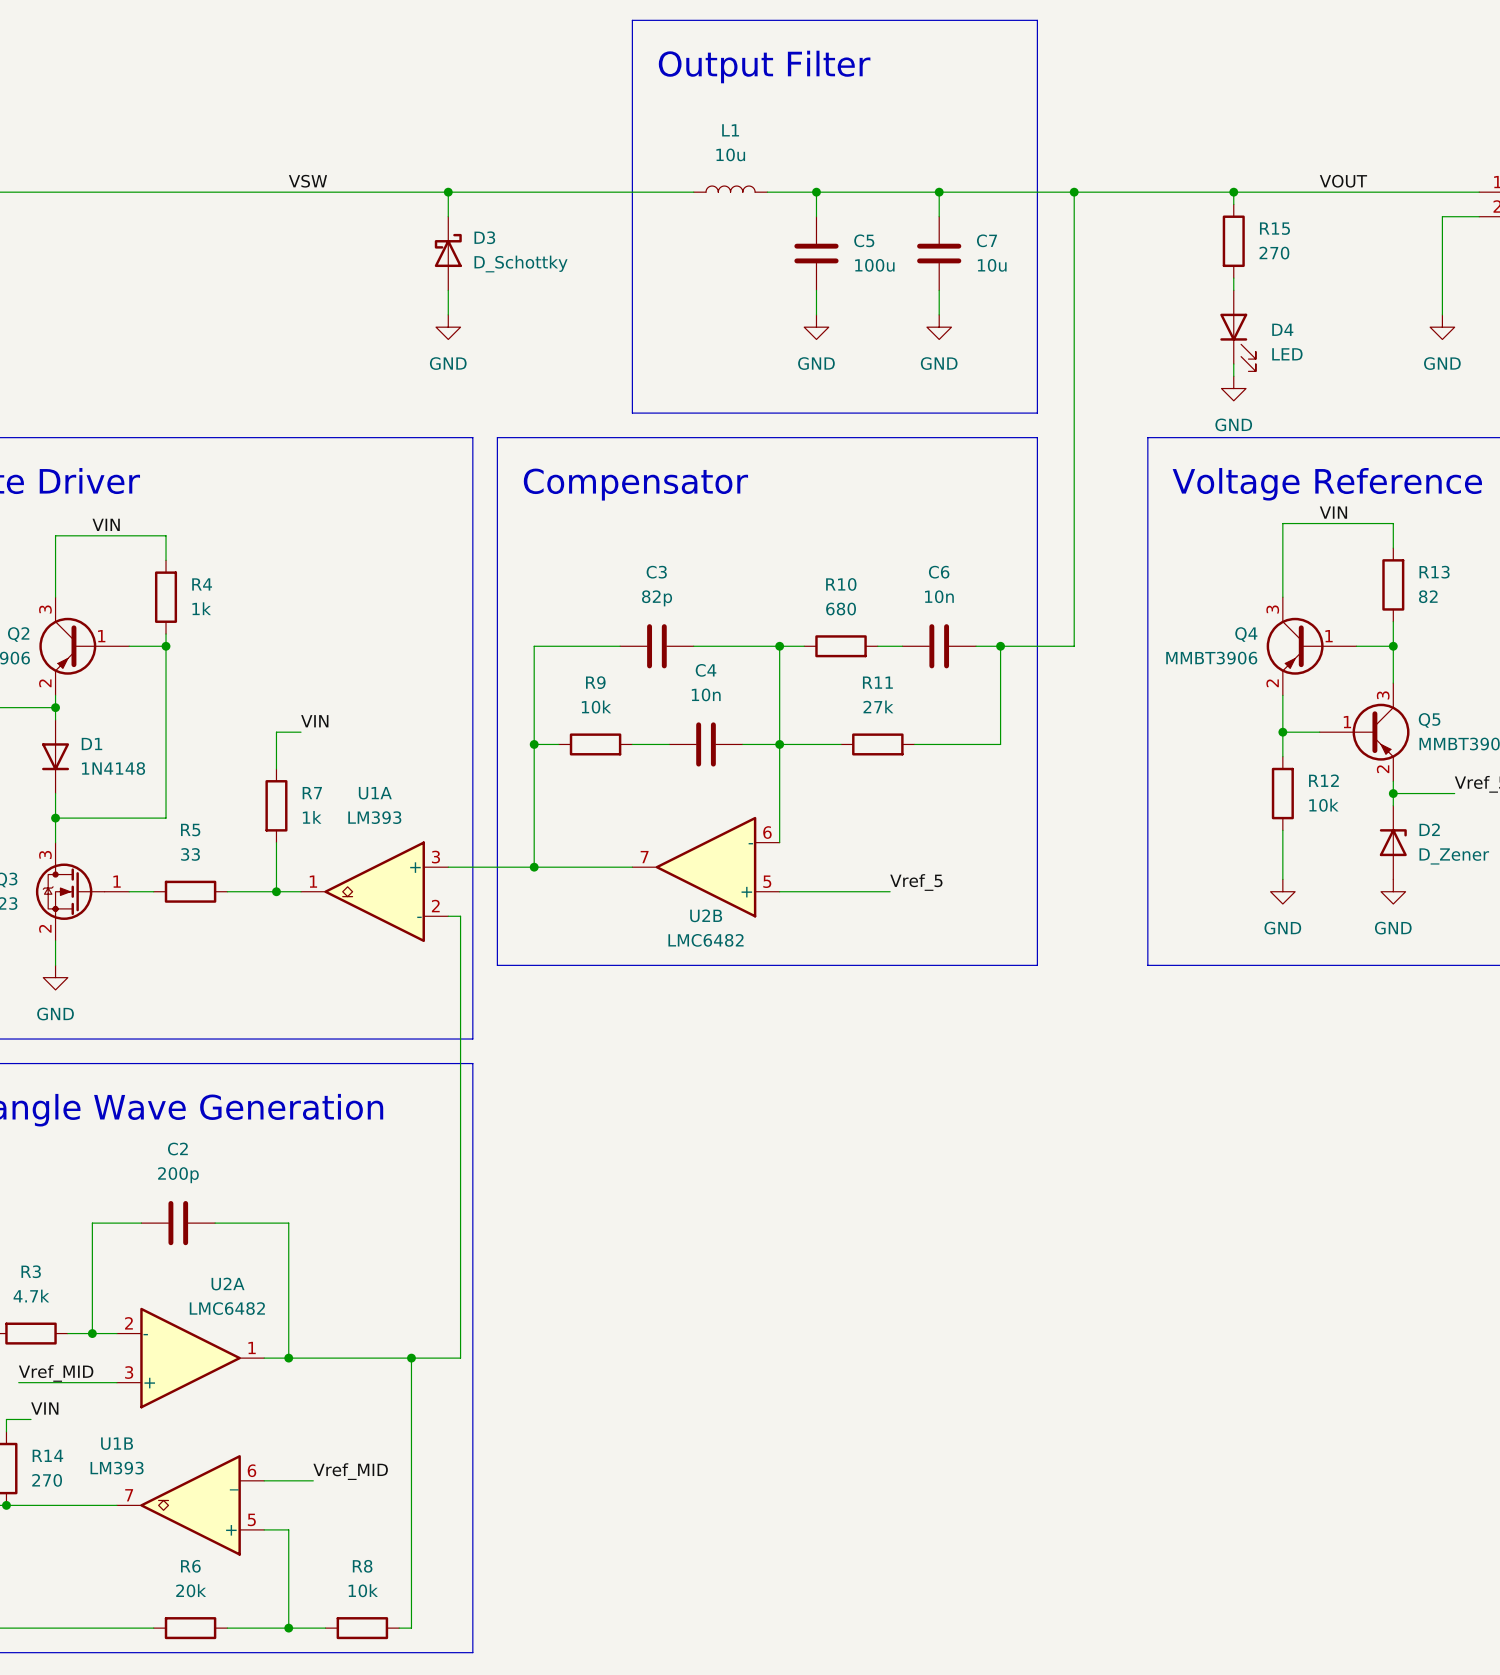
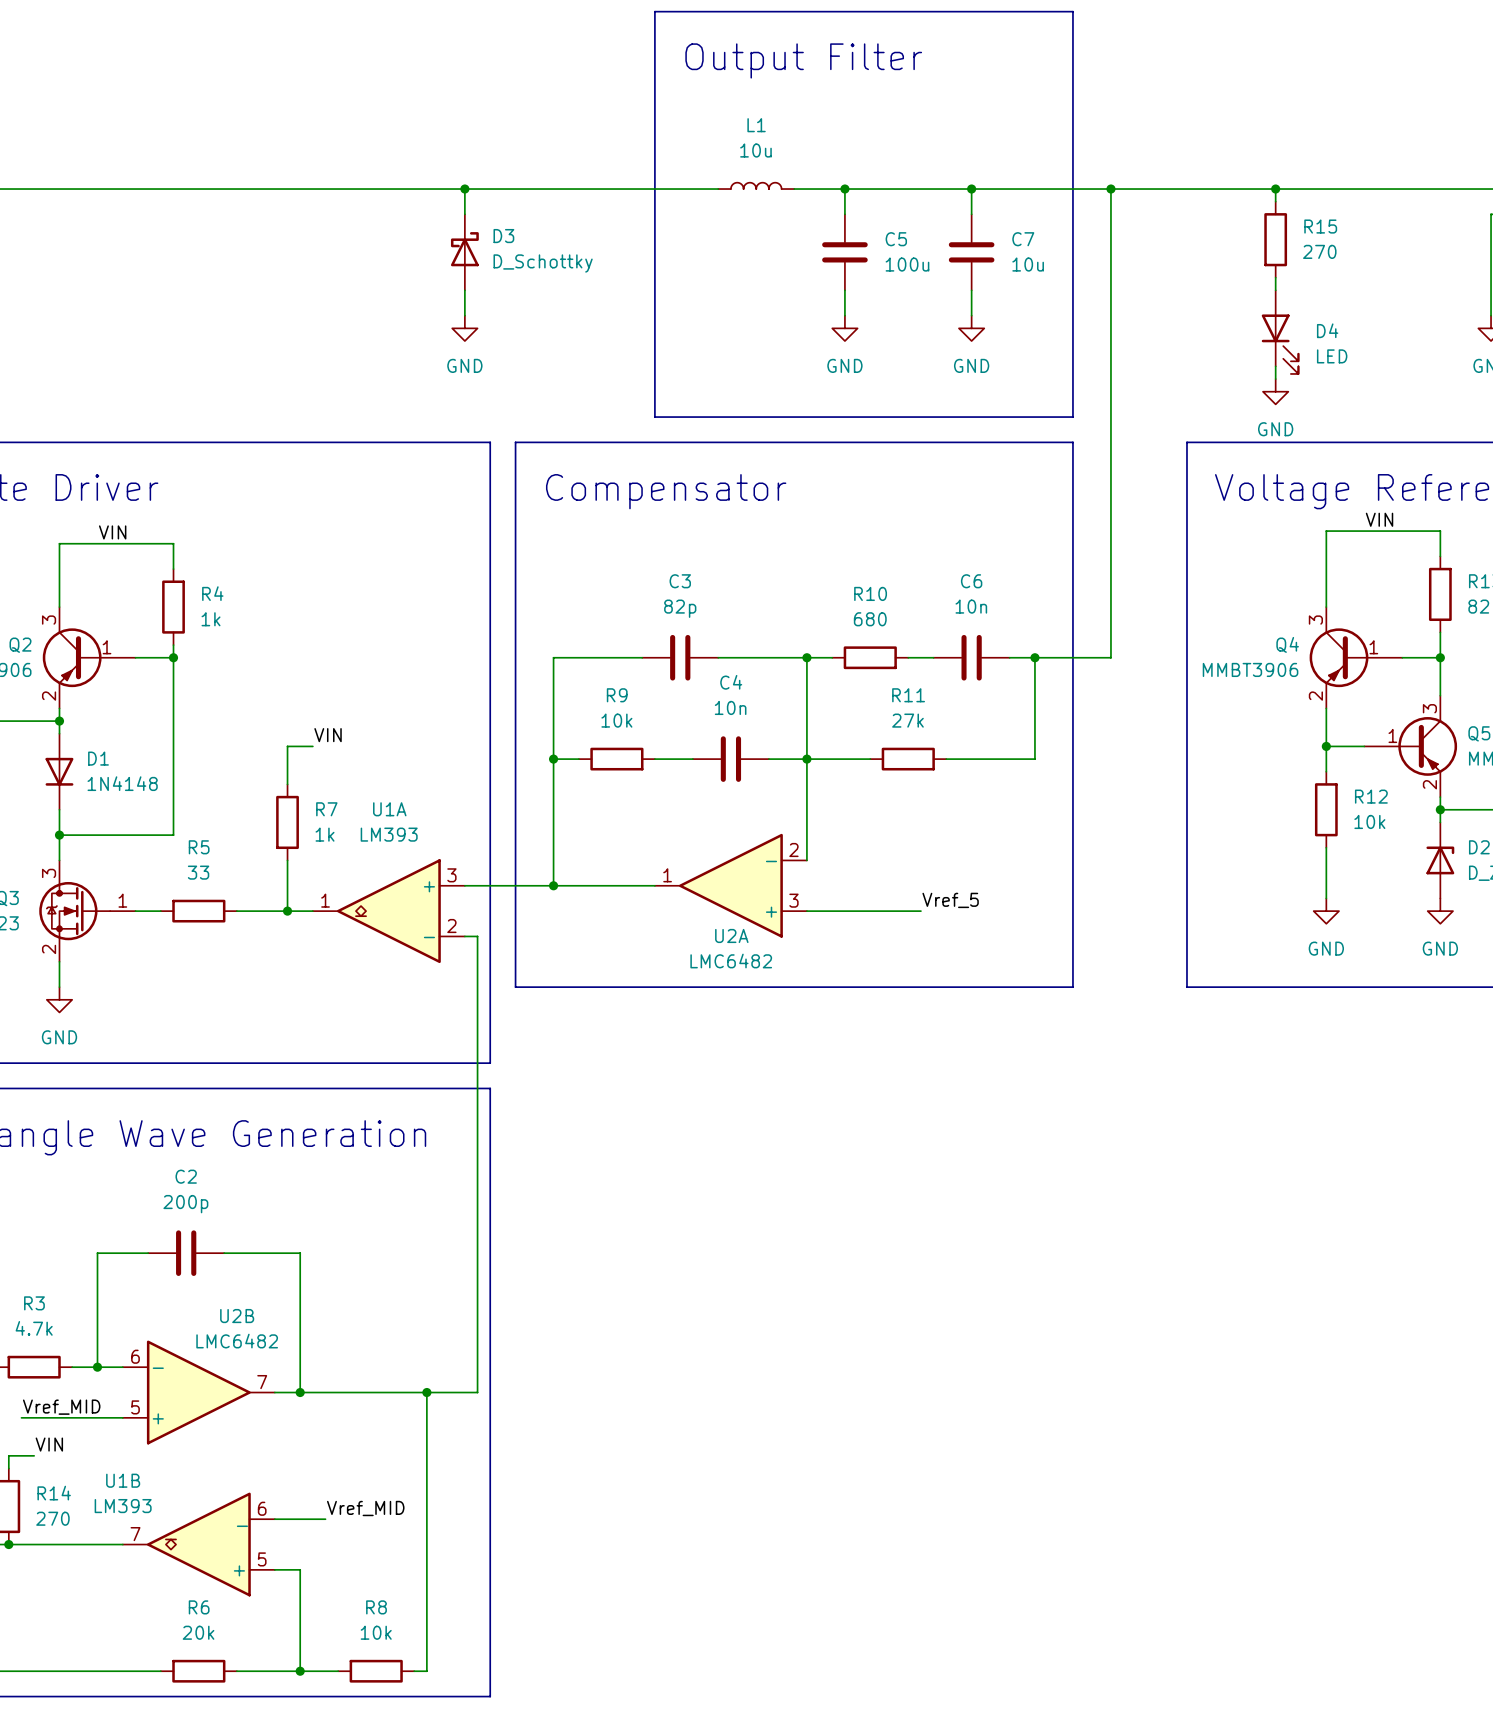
label: VSW (307, 181) -> none
label: VOUT (1343, 181) -> none
U2B flip: as is (706, 867) -> left-right (198, 1392)
U2B position: (706, 867) -> (198, 1392)
U2B name position: U2B (706, 915) -> U2B (237, 1316)
U2A name position: U2A (228, 1284) -> U2A (731, 935)
U2A flip: as is (190, 1358) -> left-right (730, 885)
U2A position: (190, 1358) -> (730, 885)

